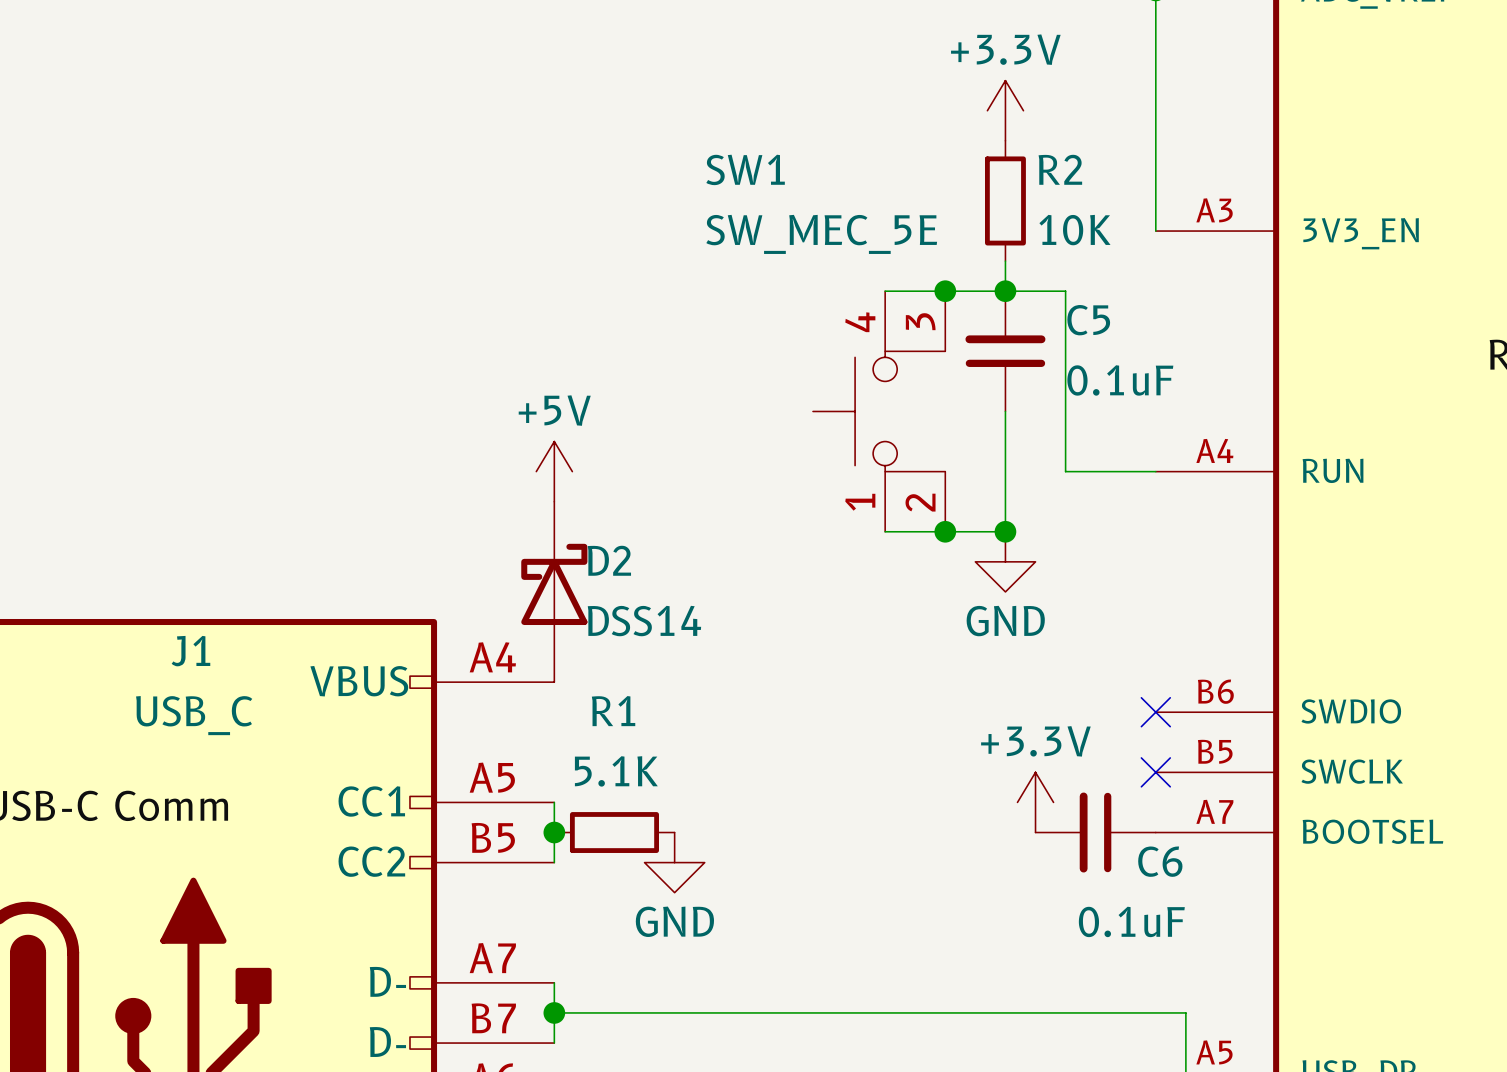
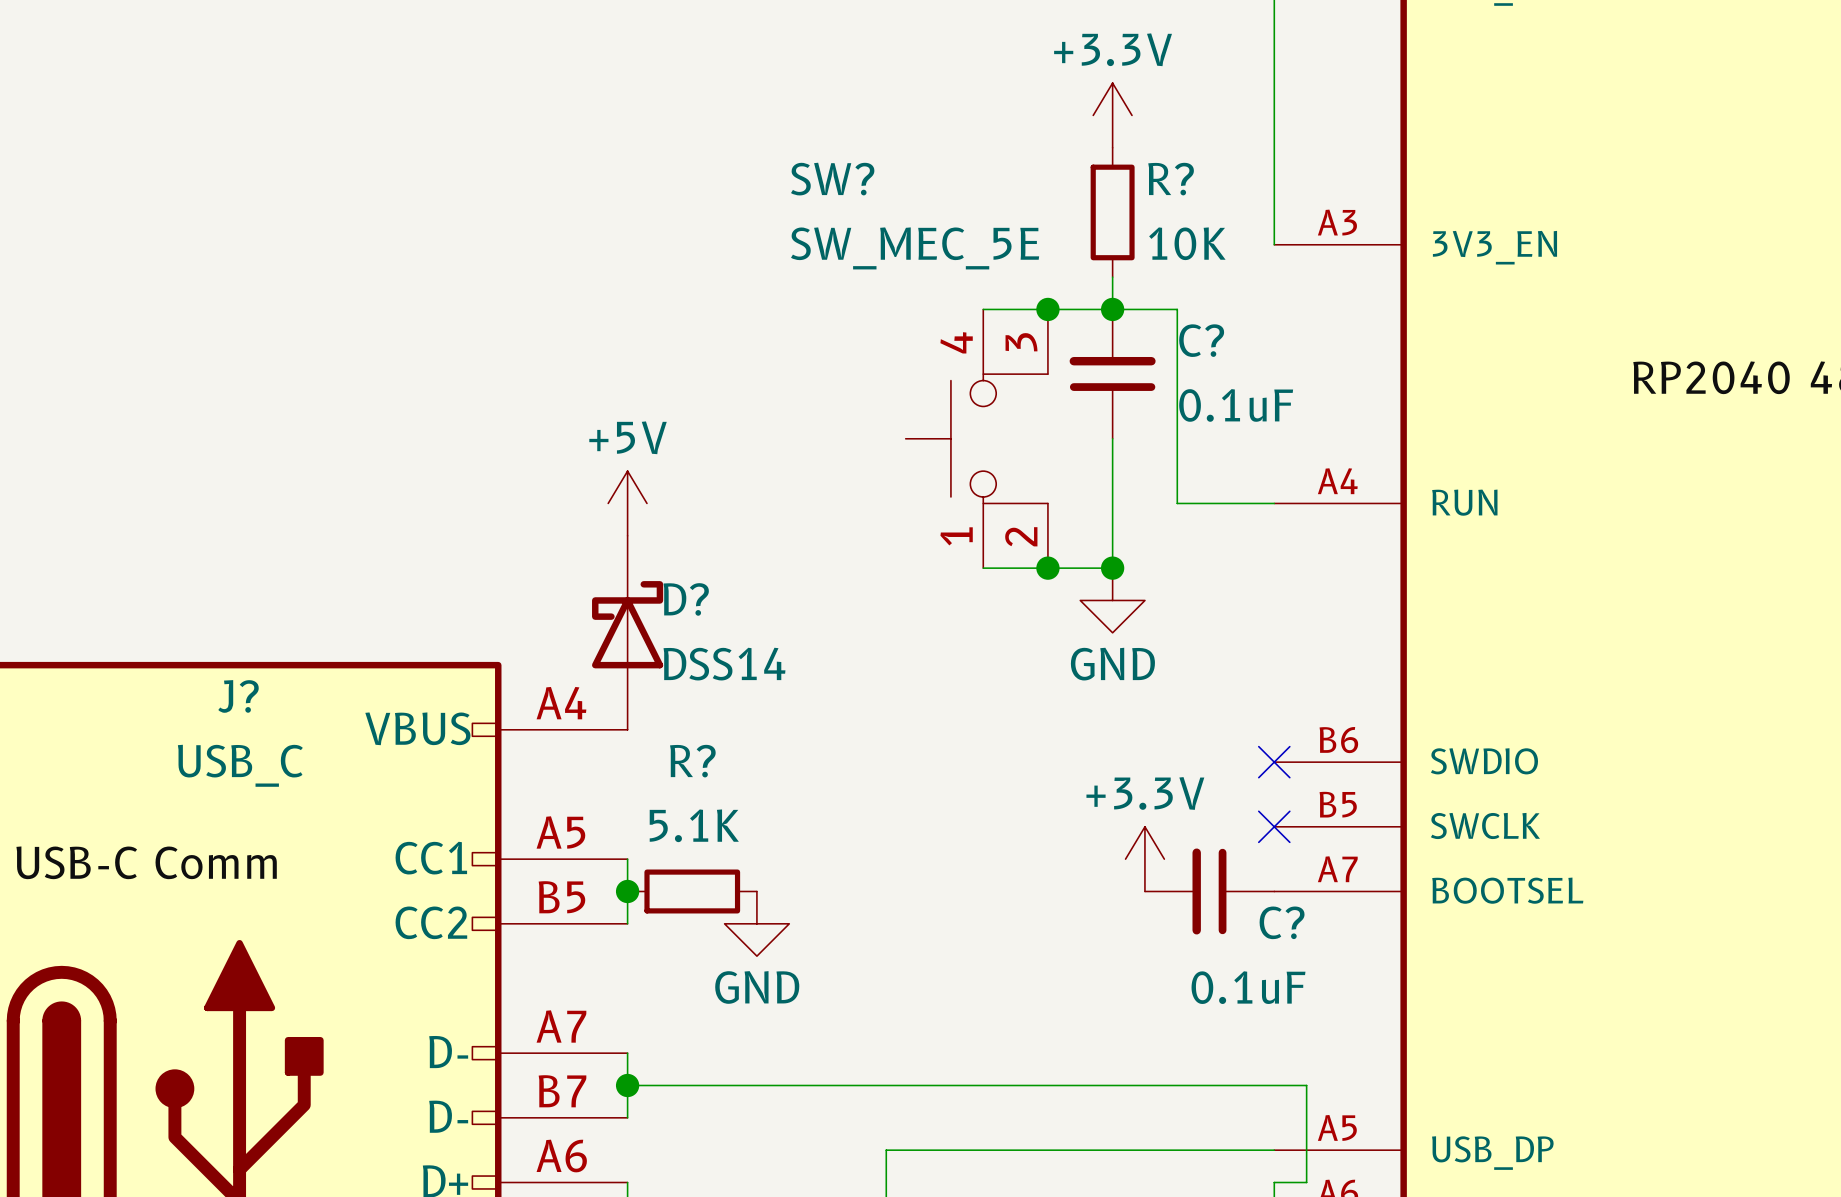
SW1 name: SW1 (745, 169) -> SW? (832, 179)
R2 name: R2 (1060, 169) -> R? (1171, 179)
C5 name: C5 (1088, 320) -> C? (1201, 340)
D2 name: D2 (609, 560) -> D? (686, 599)
J1 name: J1 (190, 651) -> J? (238, 696)
R1 name: R1 (613, 711) -> R? (692, 761)
C6 name: C6 (1160, 861) -> C? (1282, 922)

